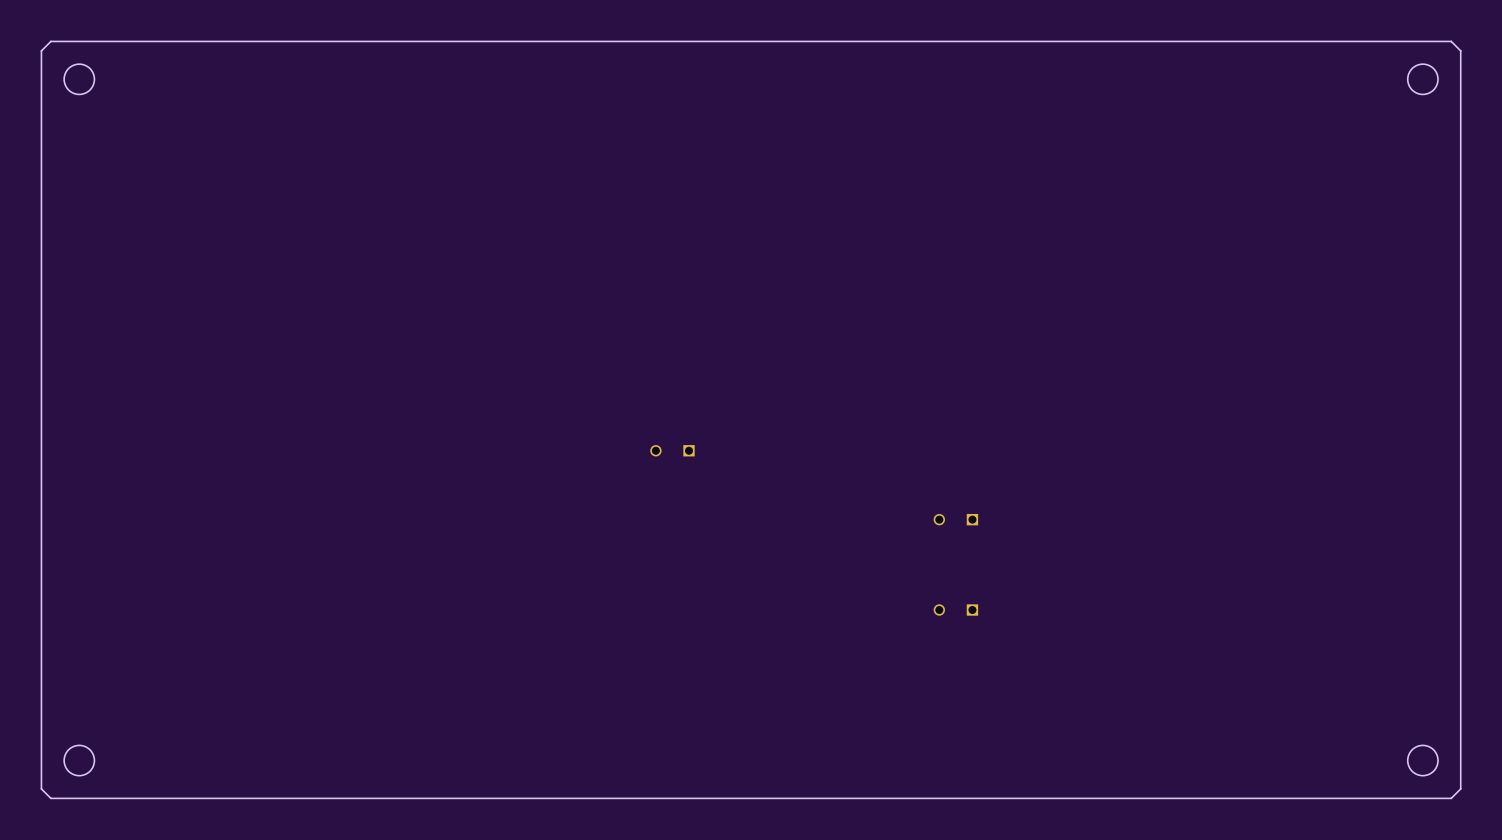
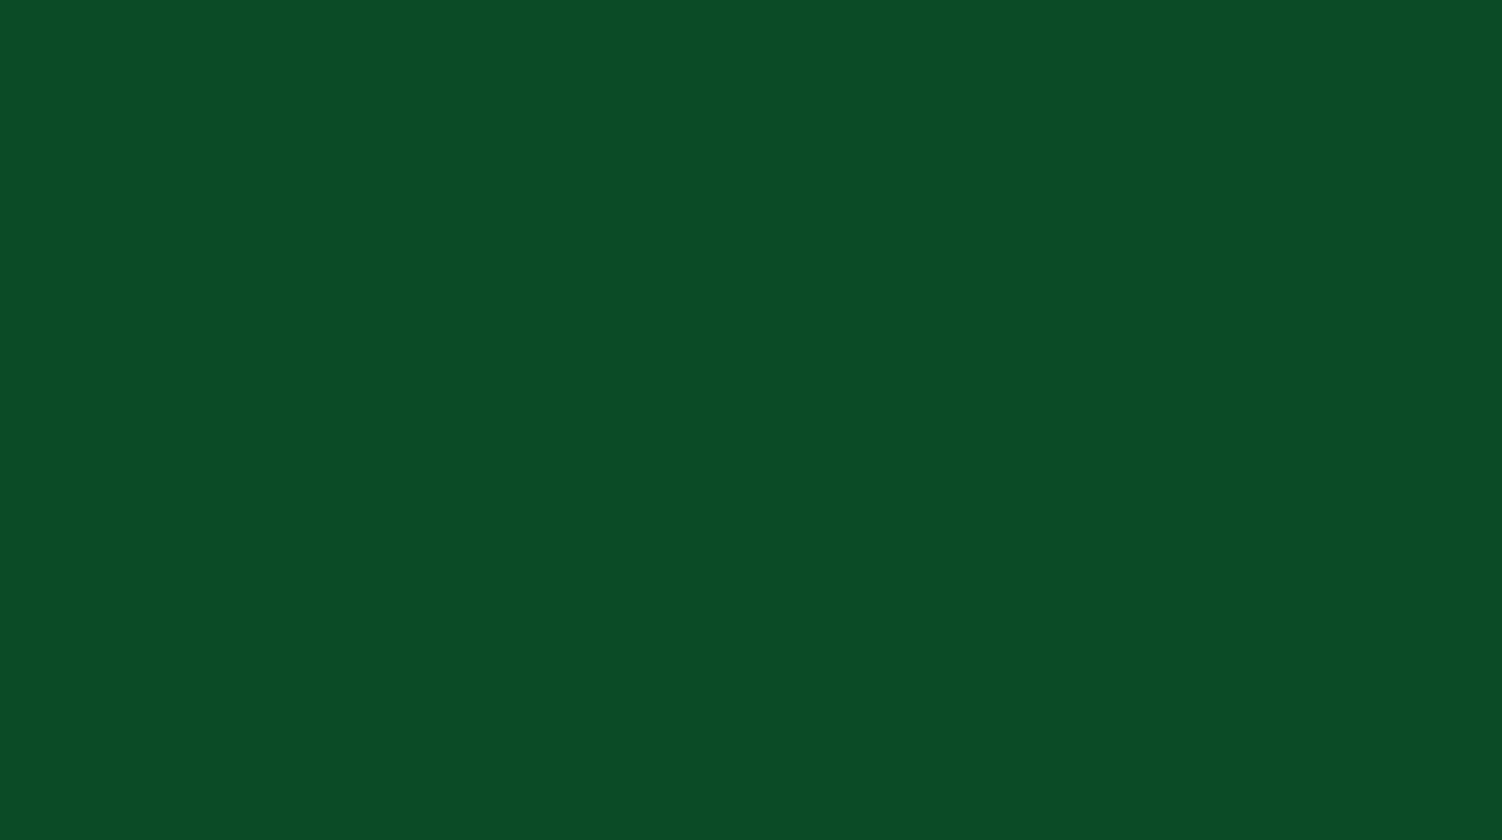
drawing: [40, 40, 1462, 799] -> none
part: (672, 450) -> none
part: (955, 519) -> none
part: (955, 610) -> none

